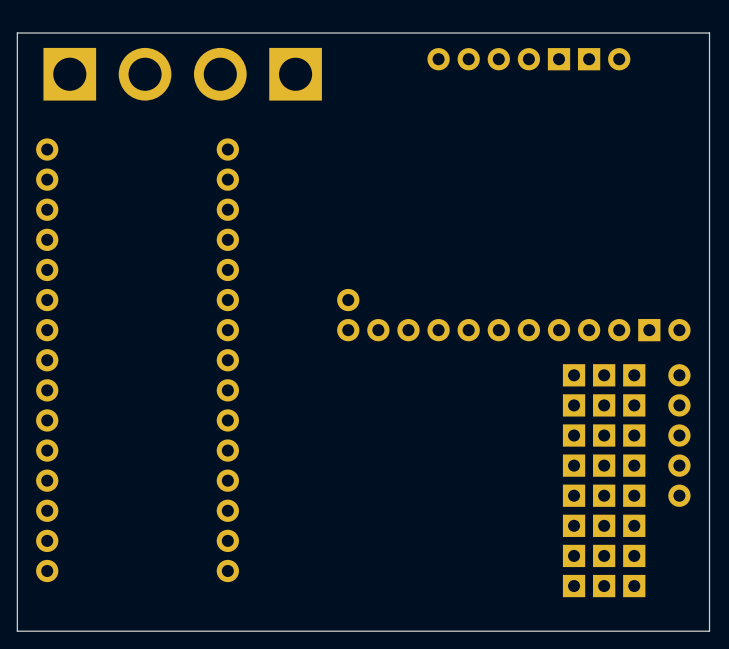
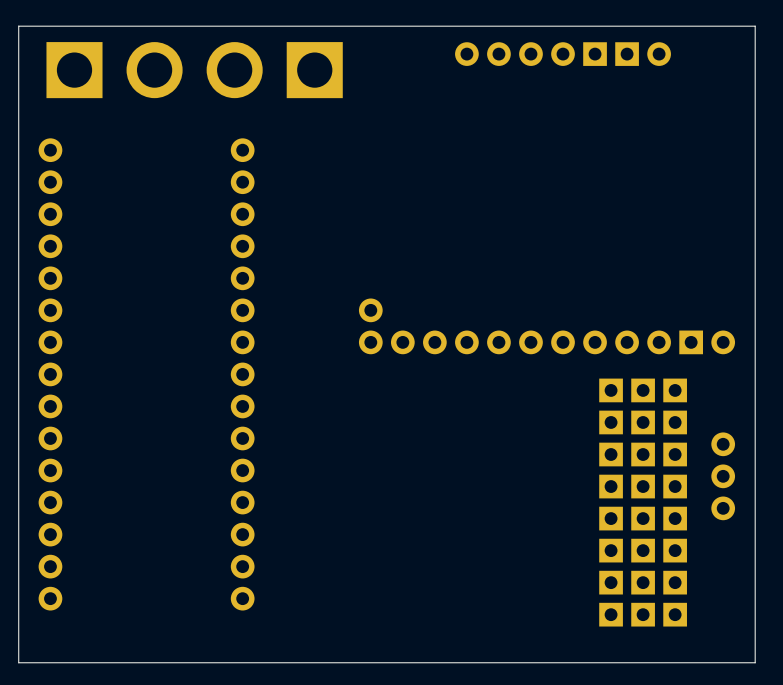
part: (679, 435) -> none
part: none -> (723, 476)

